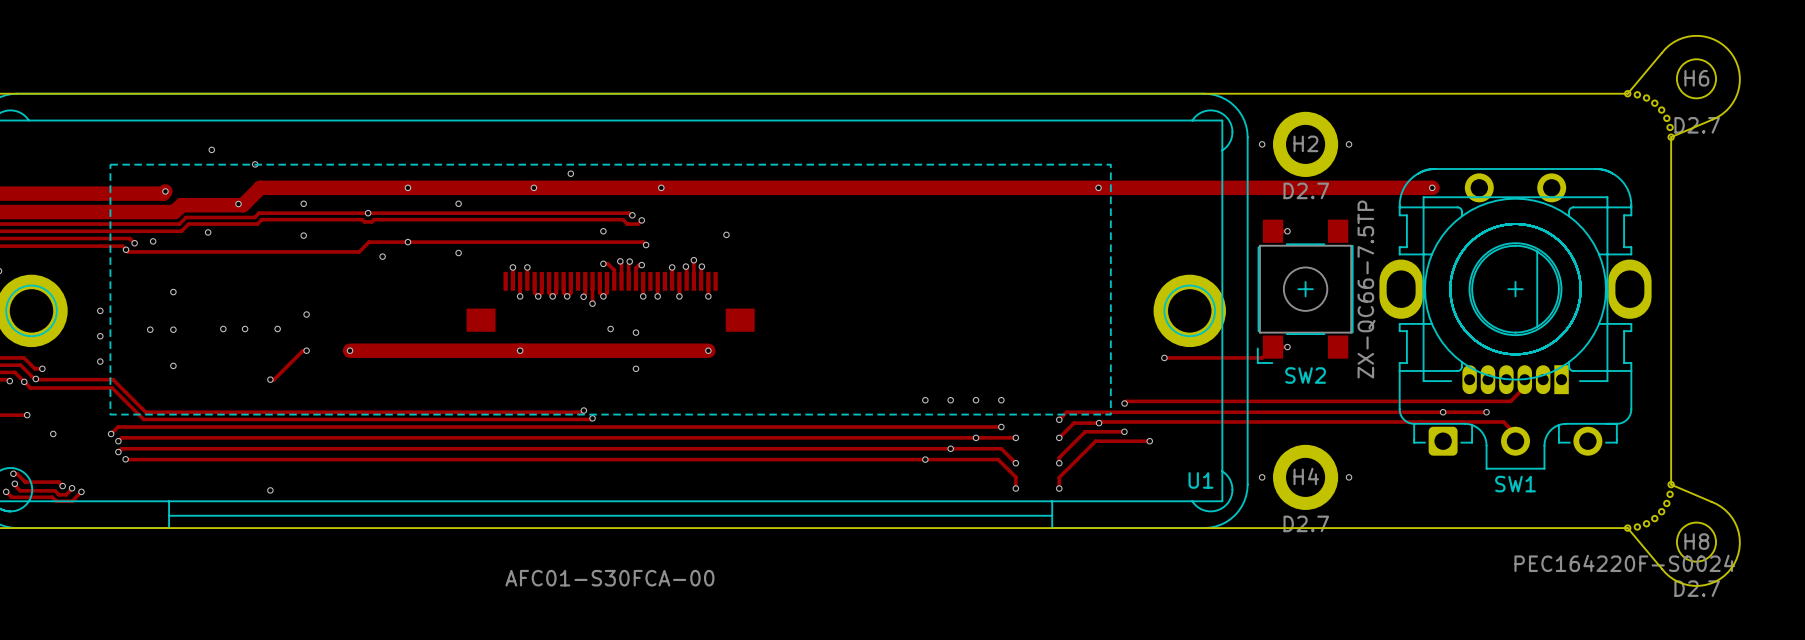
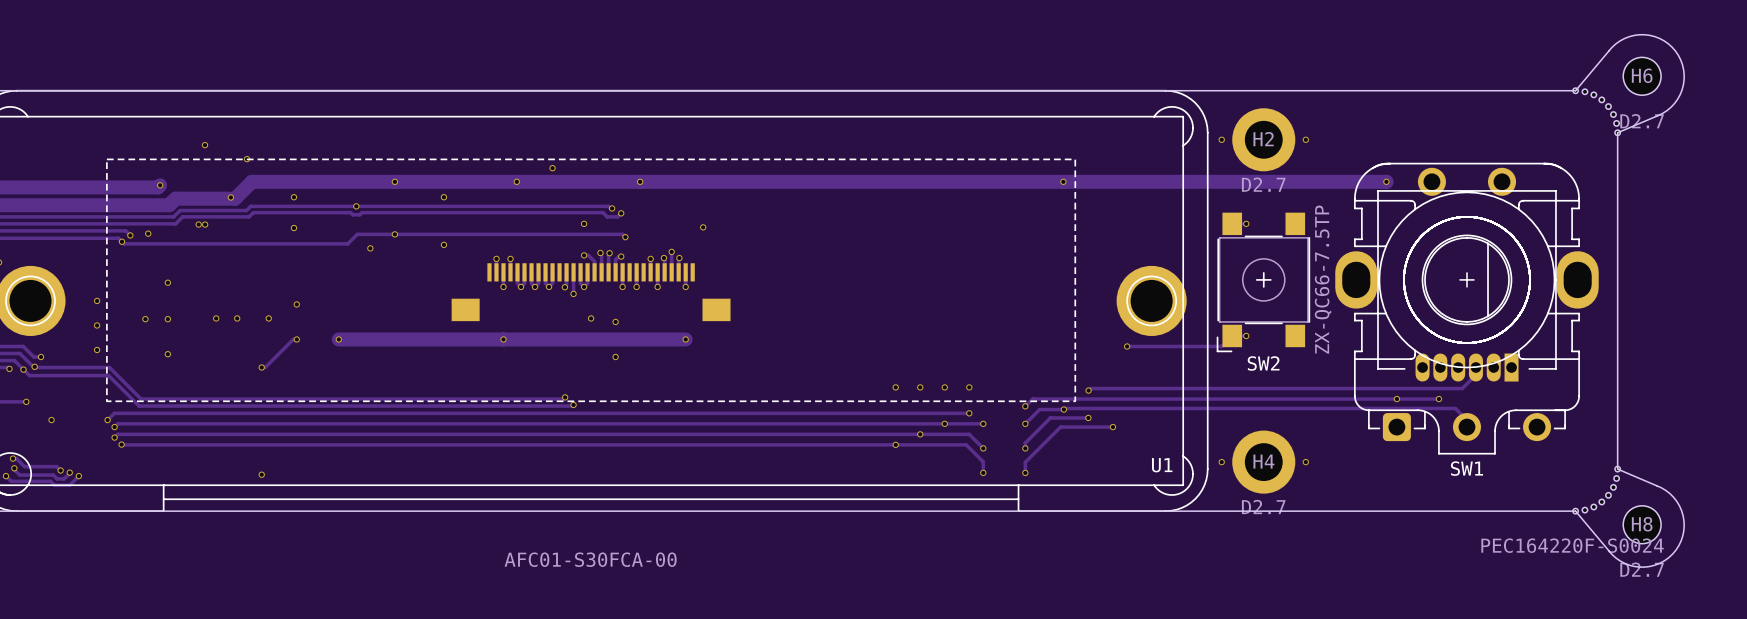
via: none -> (198, 224)
via: none -> (205, 224)
via: (208, 232) -> none

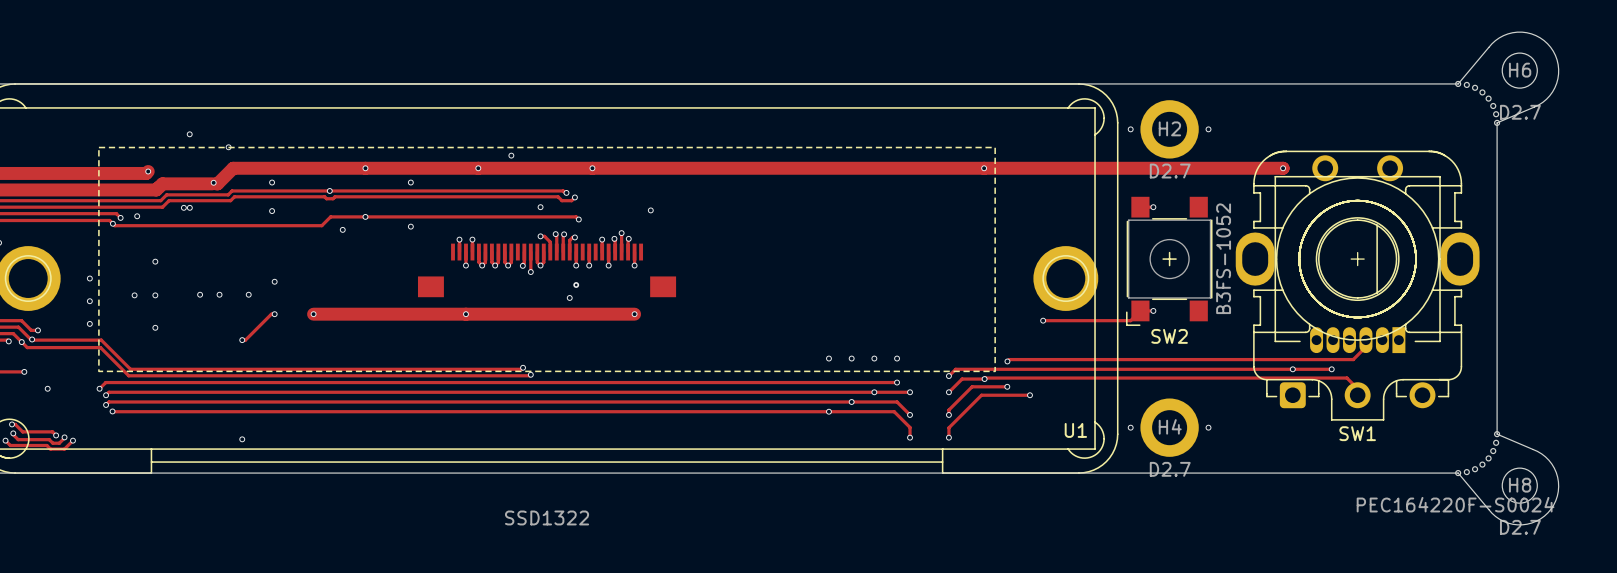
SW2 value: ZX-QC66-7.5TP (1323, 279) -> B3FS-1052 (1223, 258)
via: none -> (576, 285)
via: (591, 318) -> none
via: (615, 357) -> none
U1 value: AFC01-S30FCA-00 (590, 559) -> SSD1322 (547, 517)

